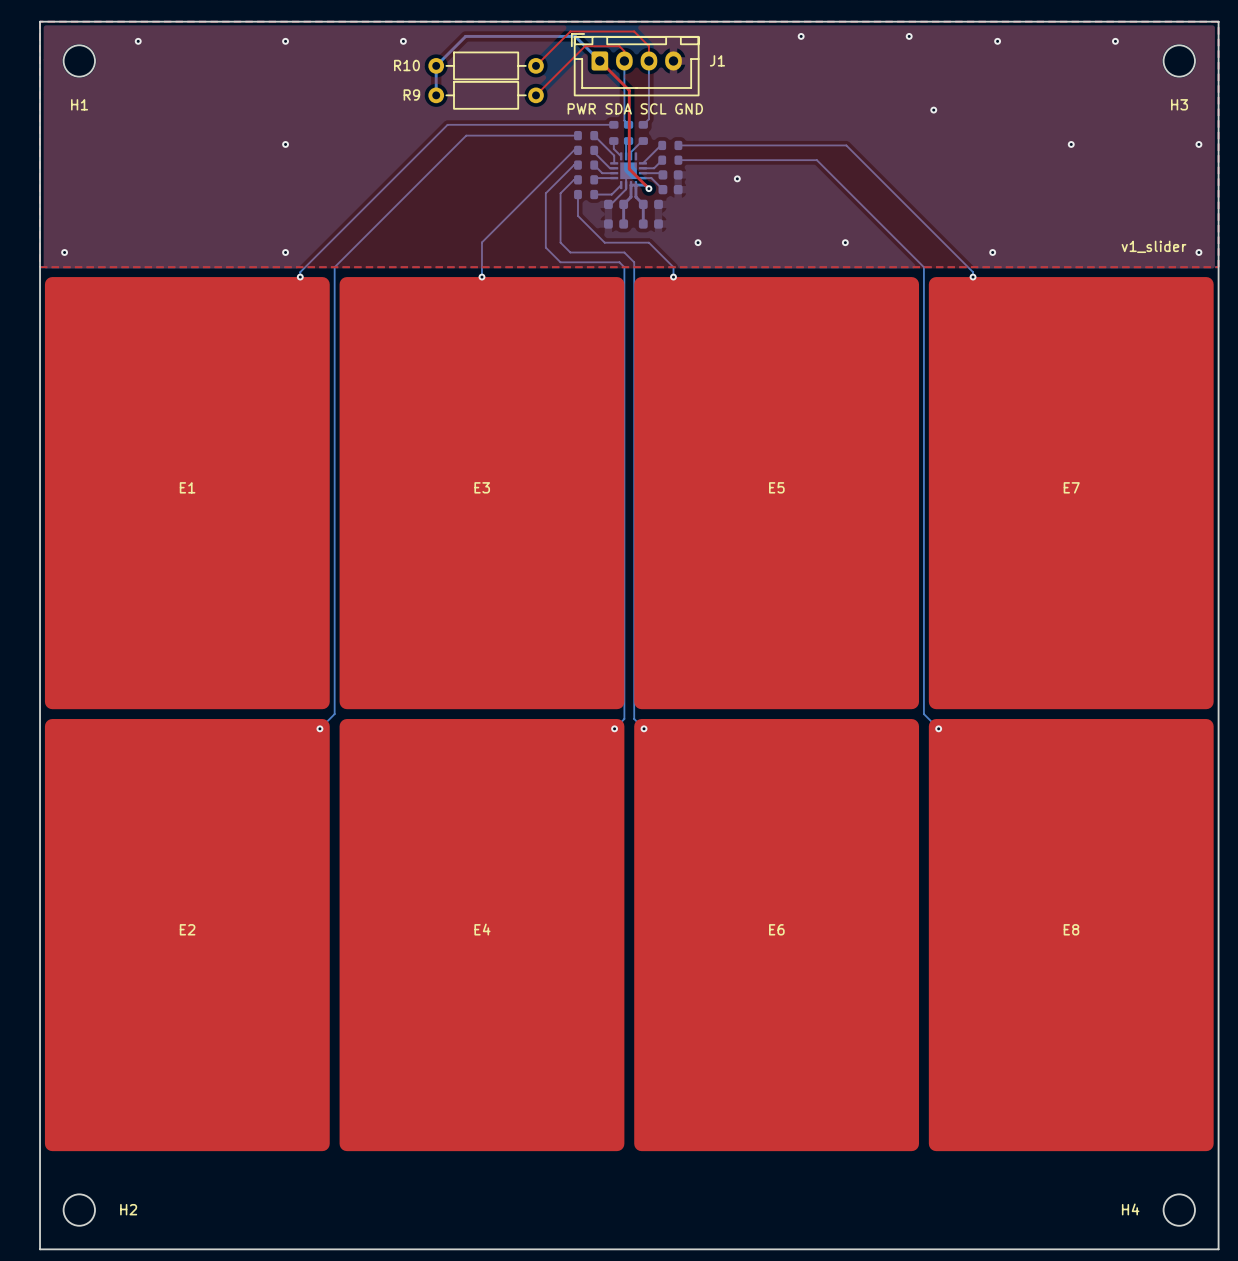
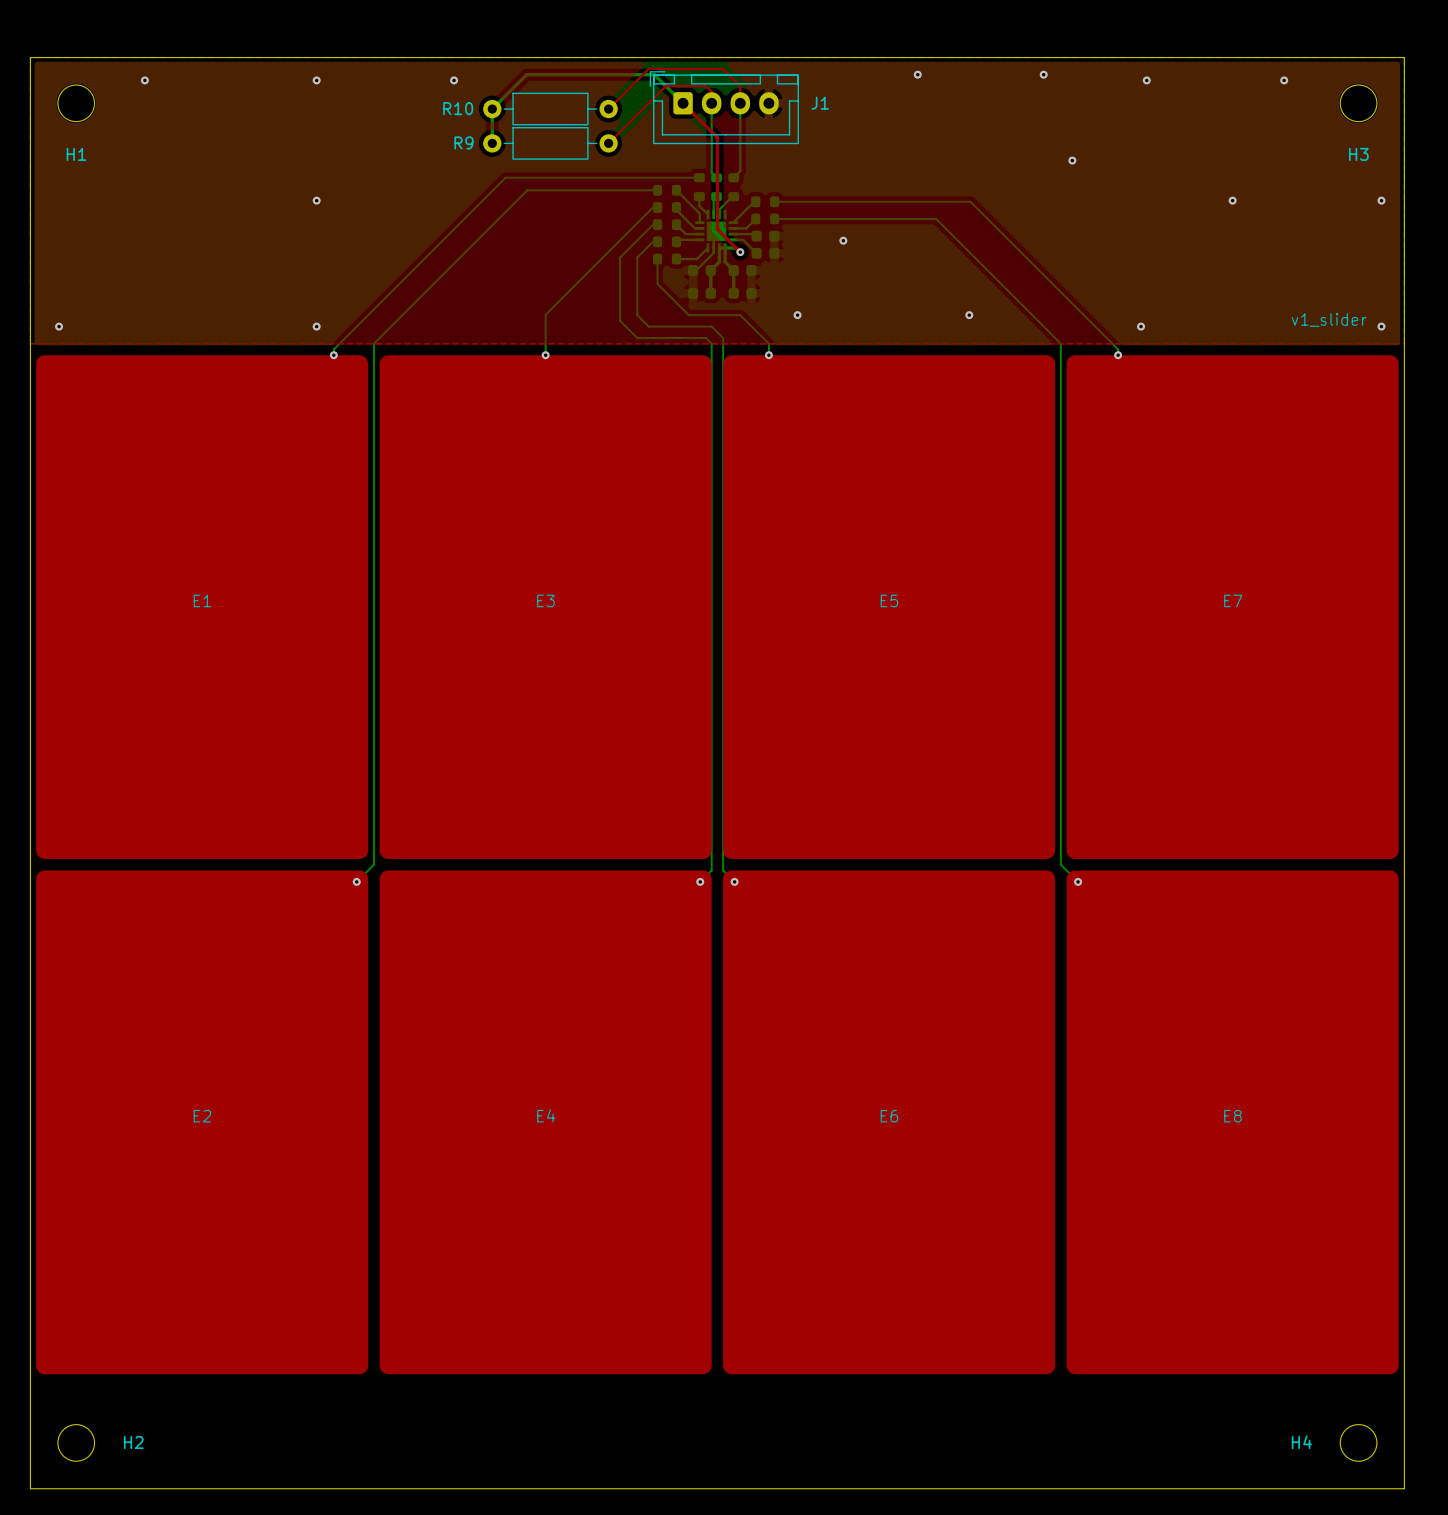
text: PWR SDA SCL GND (635, 108) -> none

